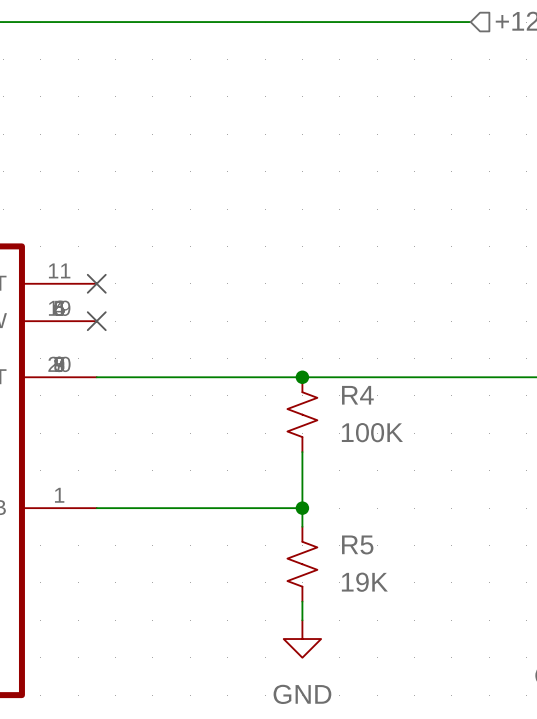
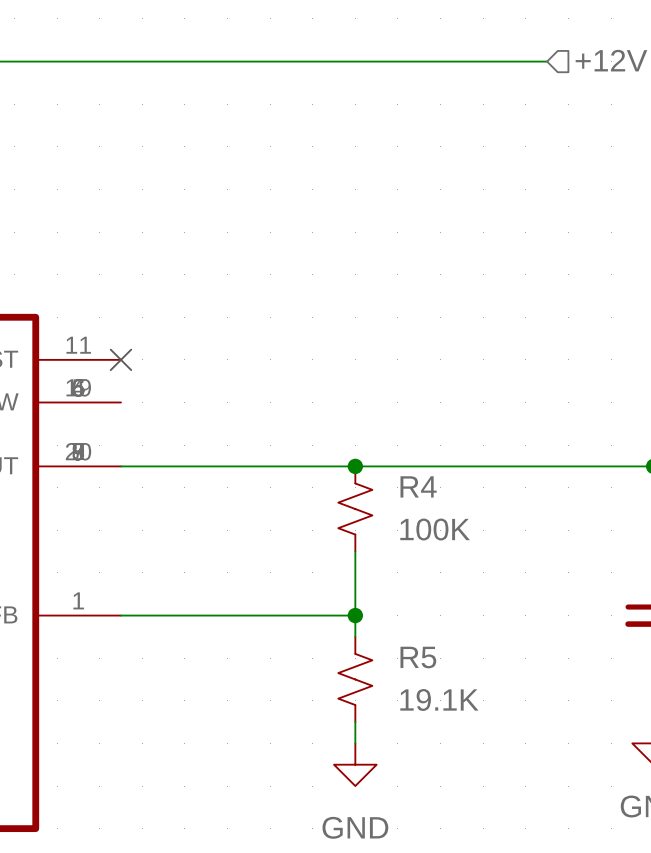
no-connect mark: (96, 321) -> none
R5 value: 19K (364, 582) -> 19.1K (439, 699)

